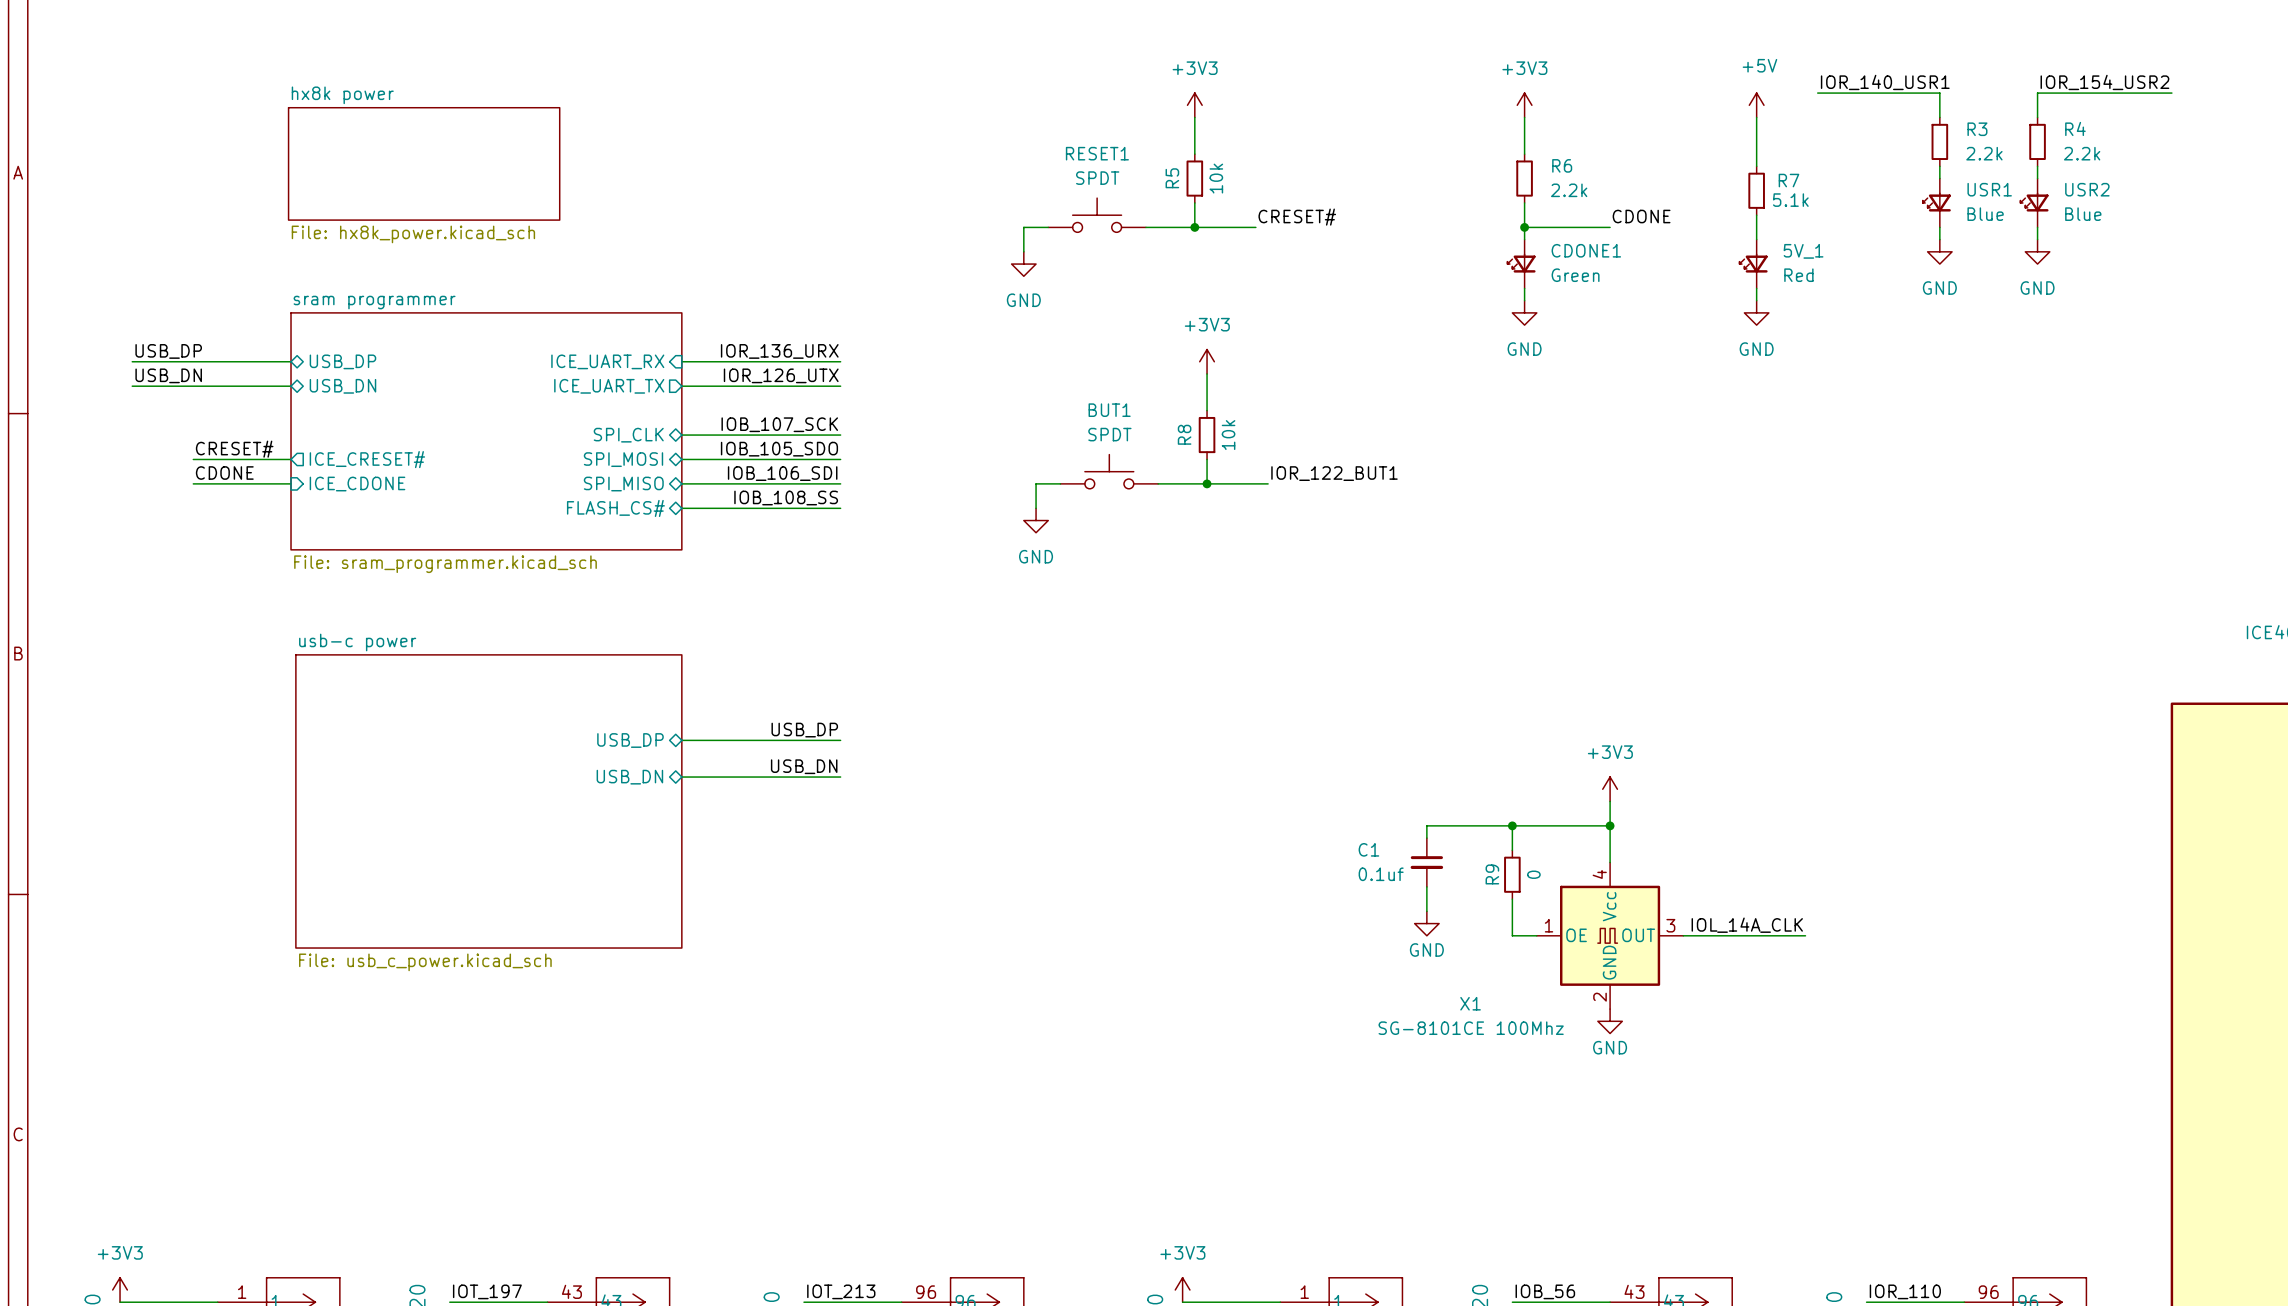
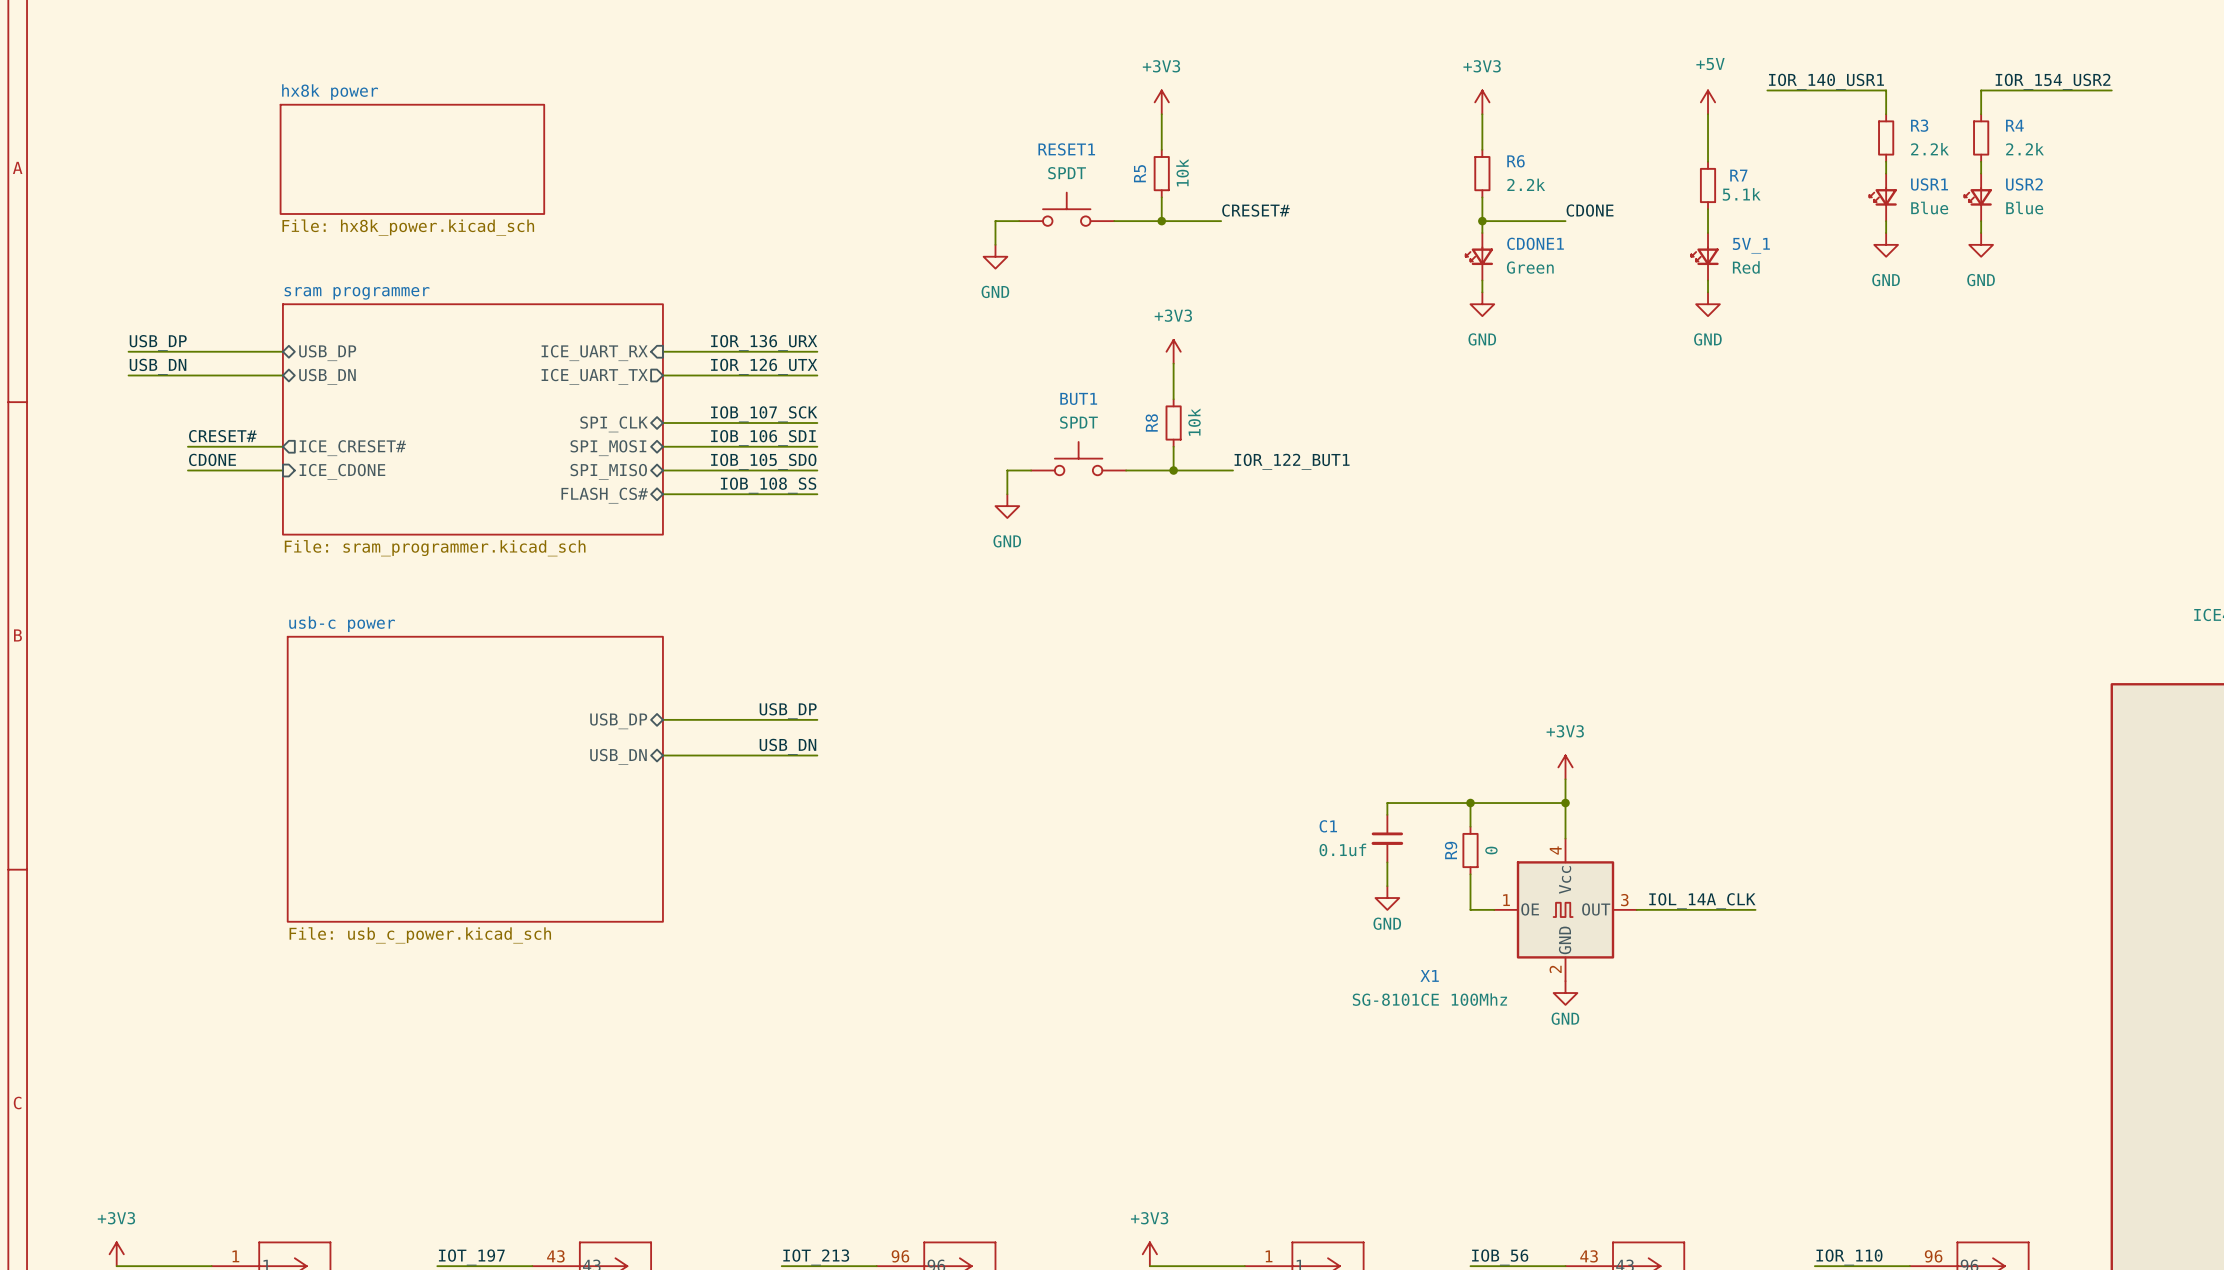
label: IOB_105_SDO (779, 449) -> IOB_106_SDI (763, 437)
label: IOB_106_SDI (782, 473) -> IOB_105_SDO (763, 461)

